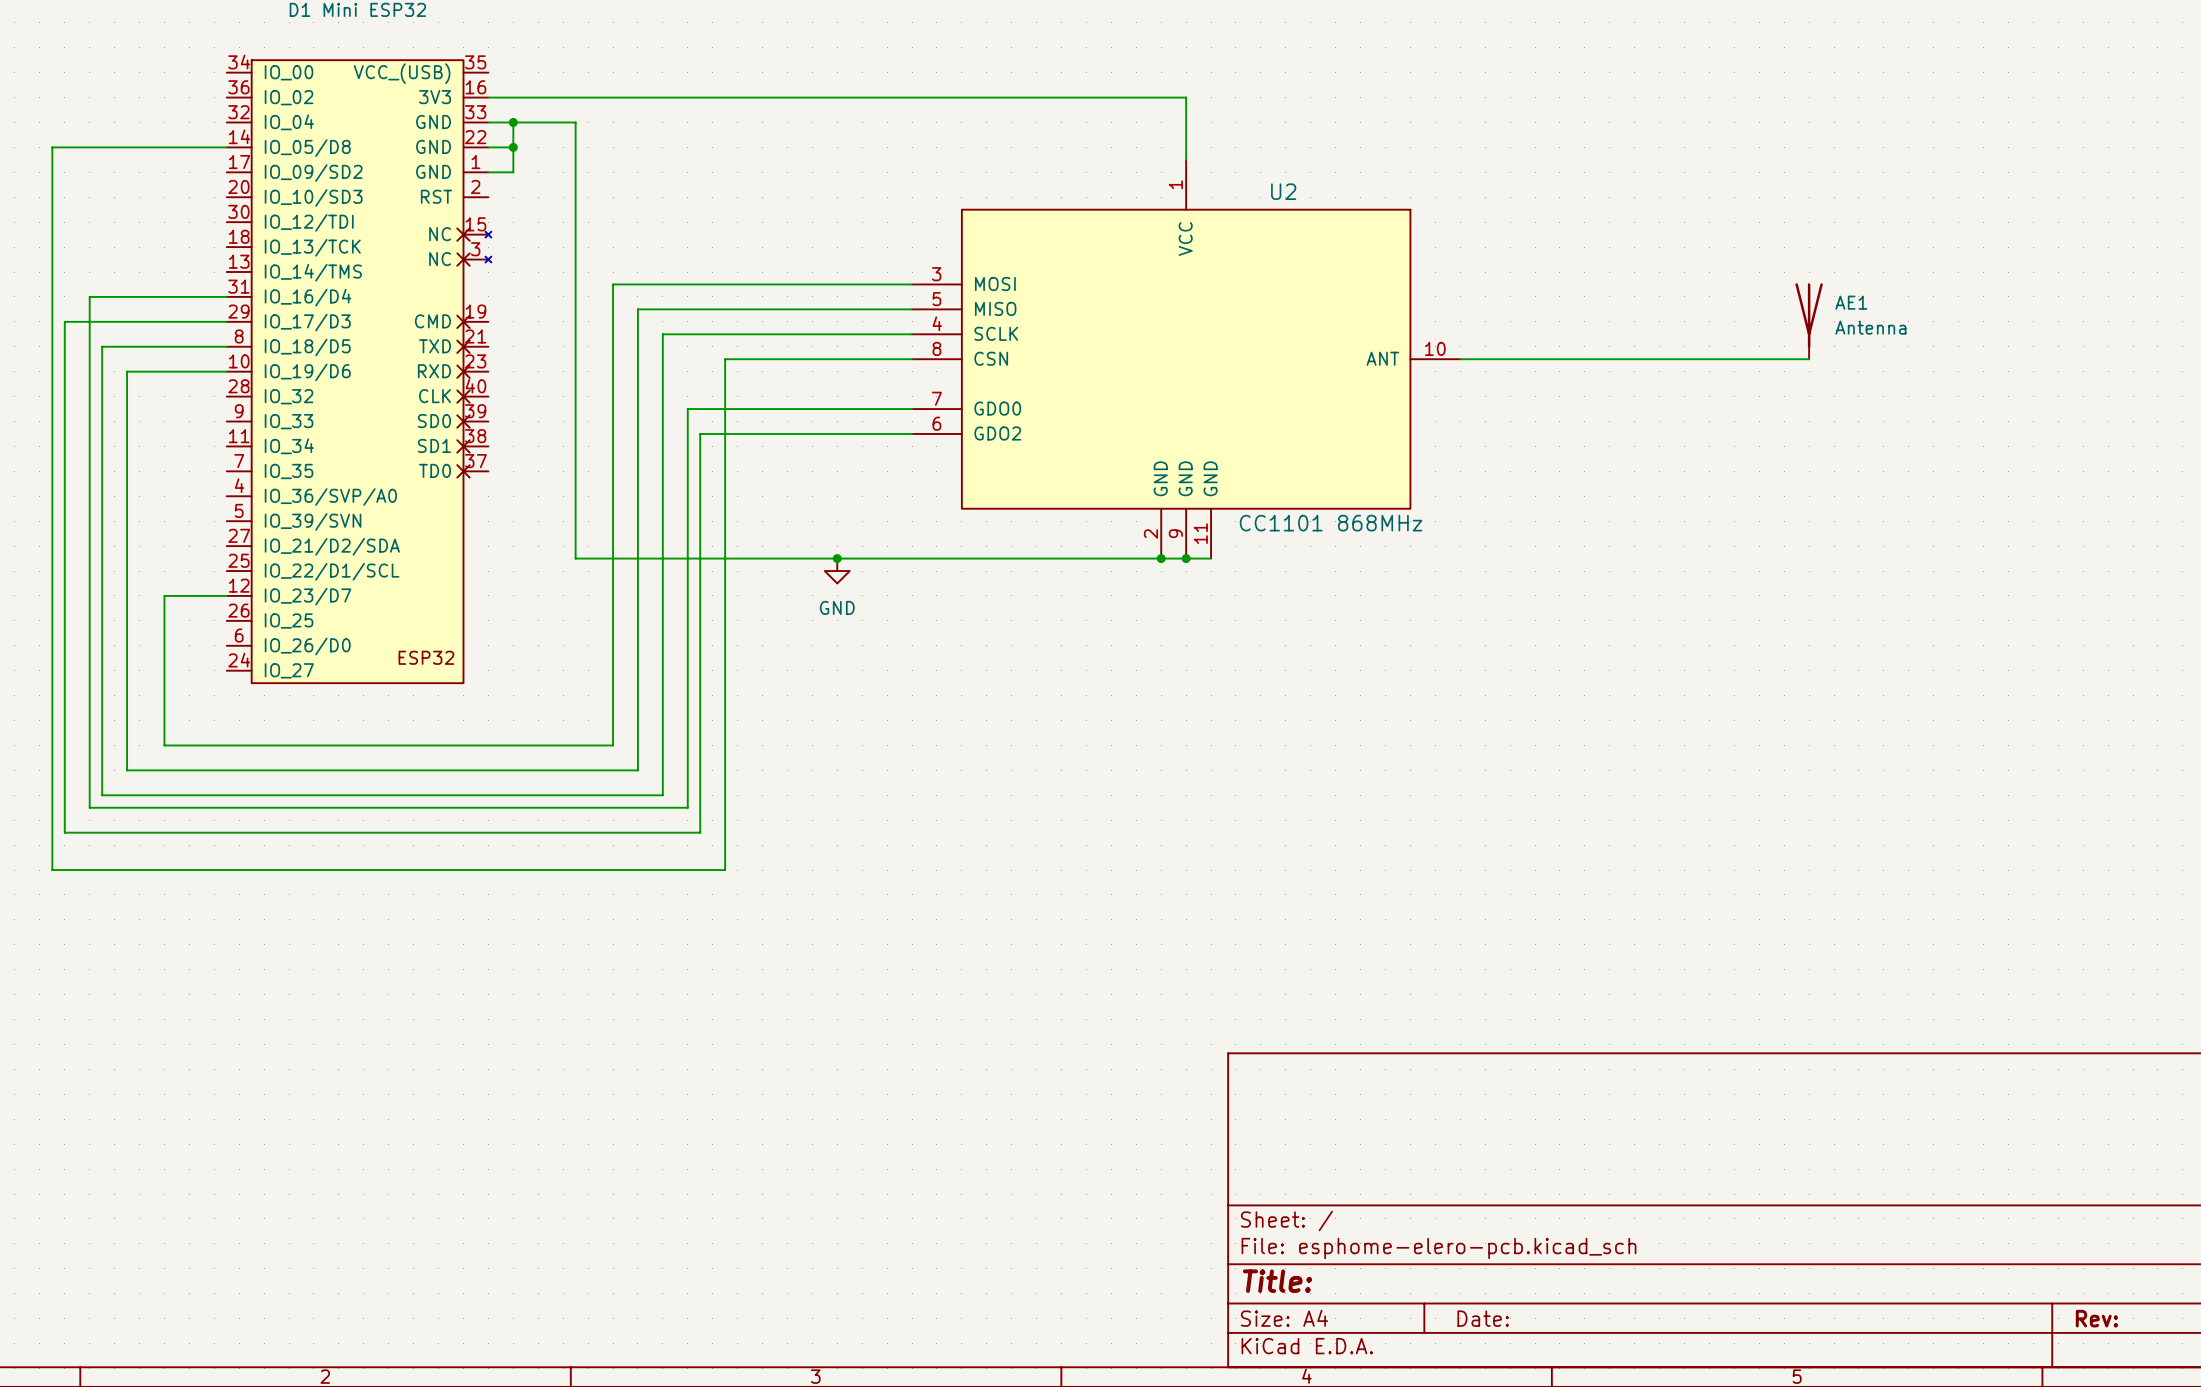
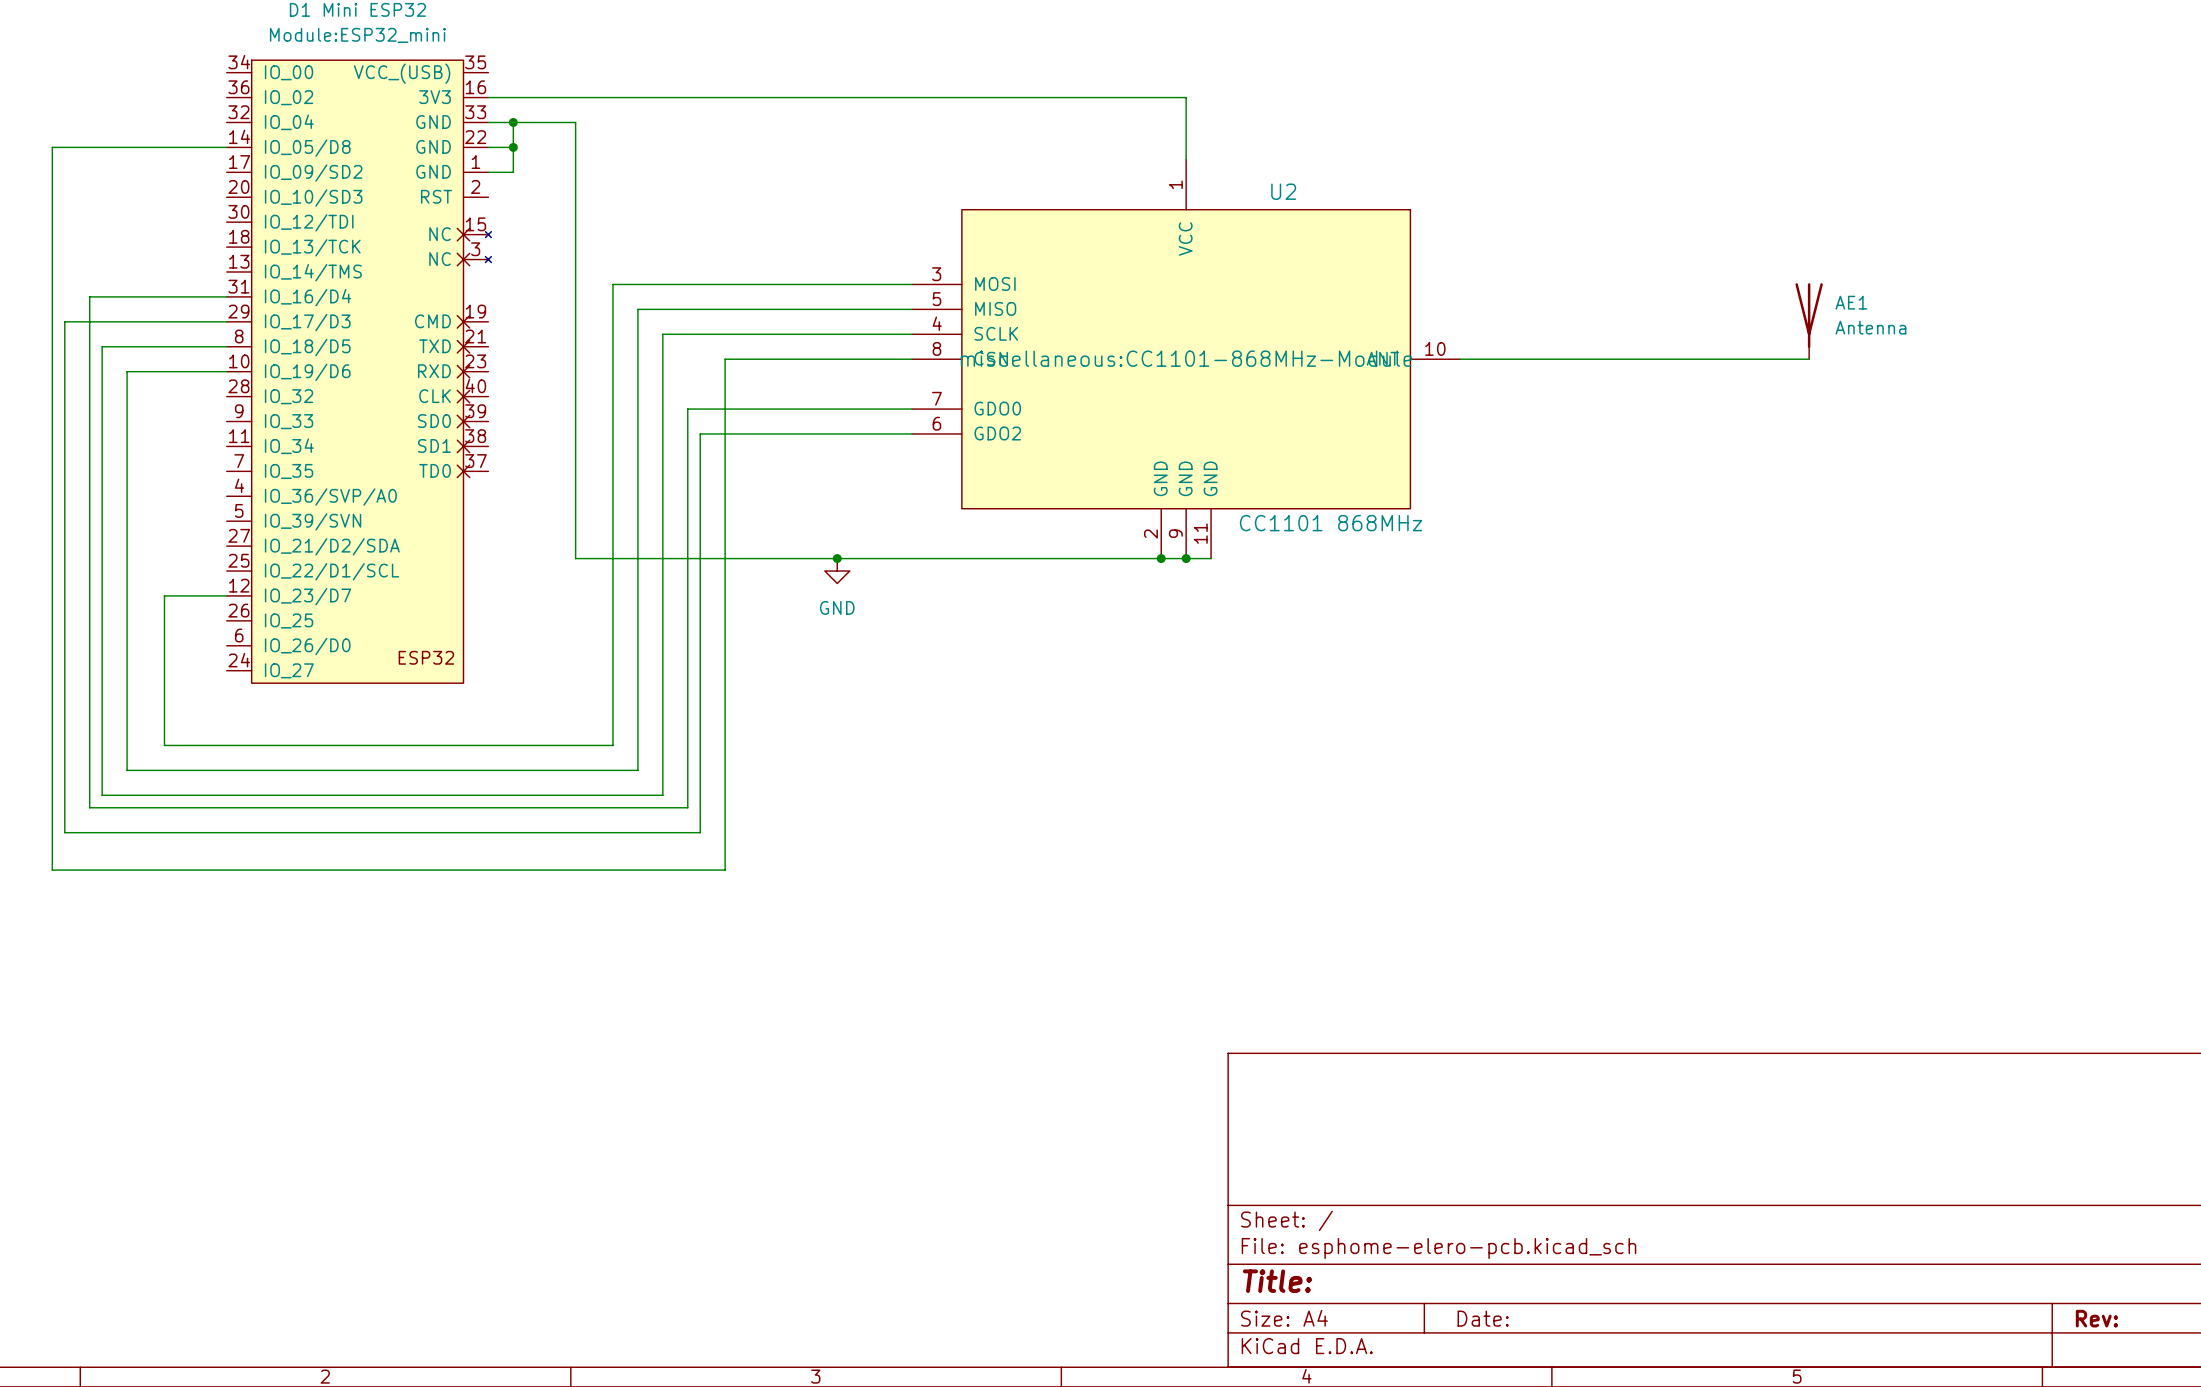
part text: none -> Module:ESP32_mini (357, 35)
U2 text: none -> miscellaneous:CC1101-868MHz-Module (1186, 358)

